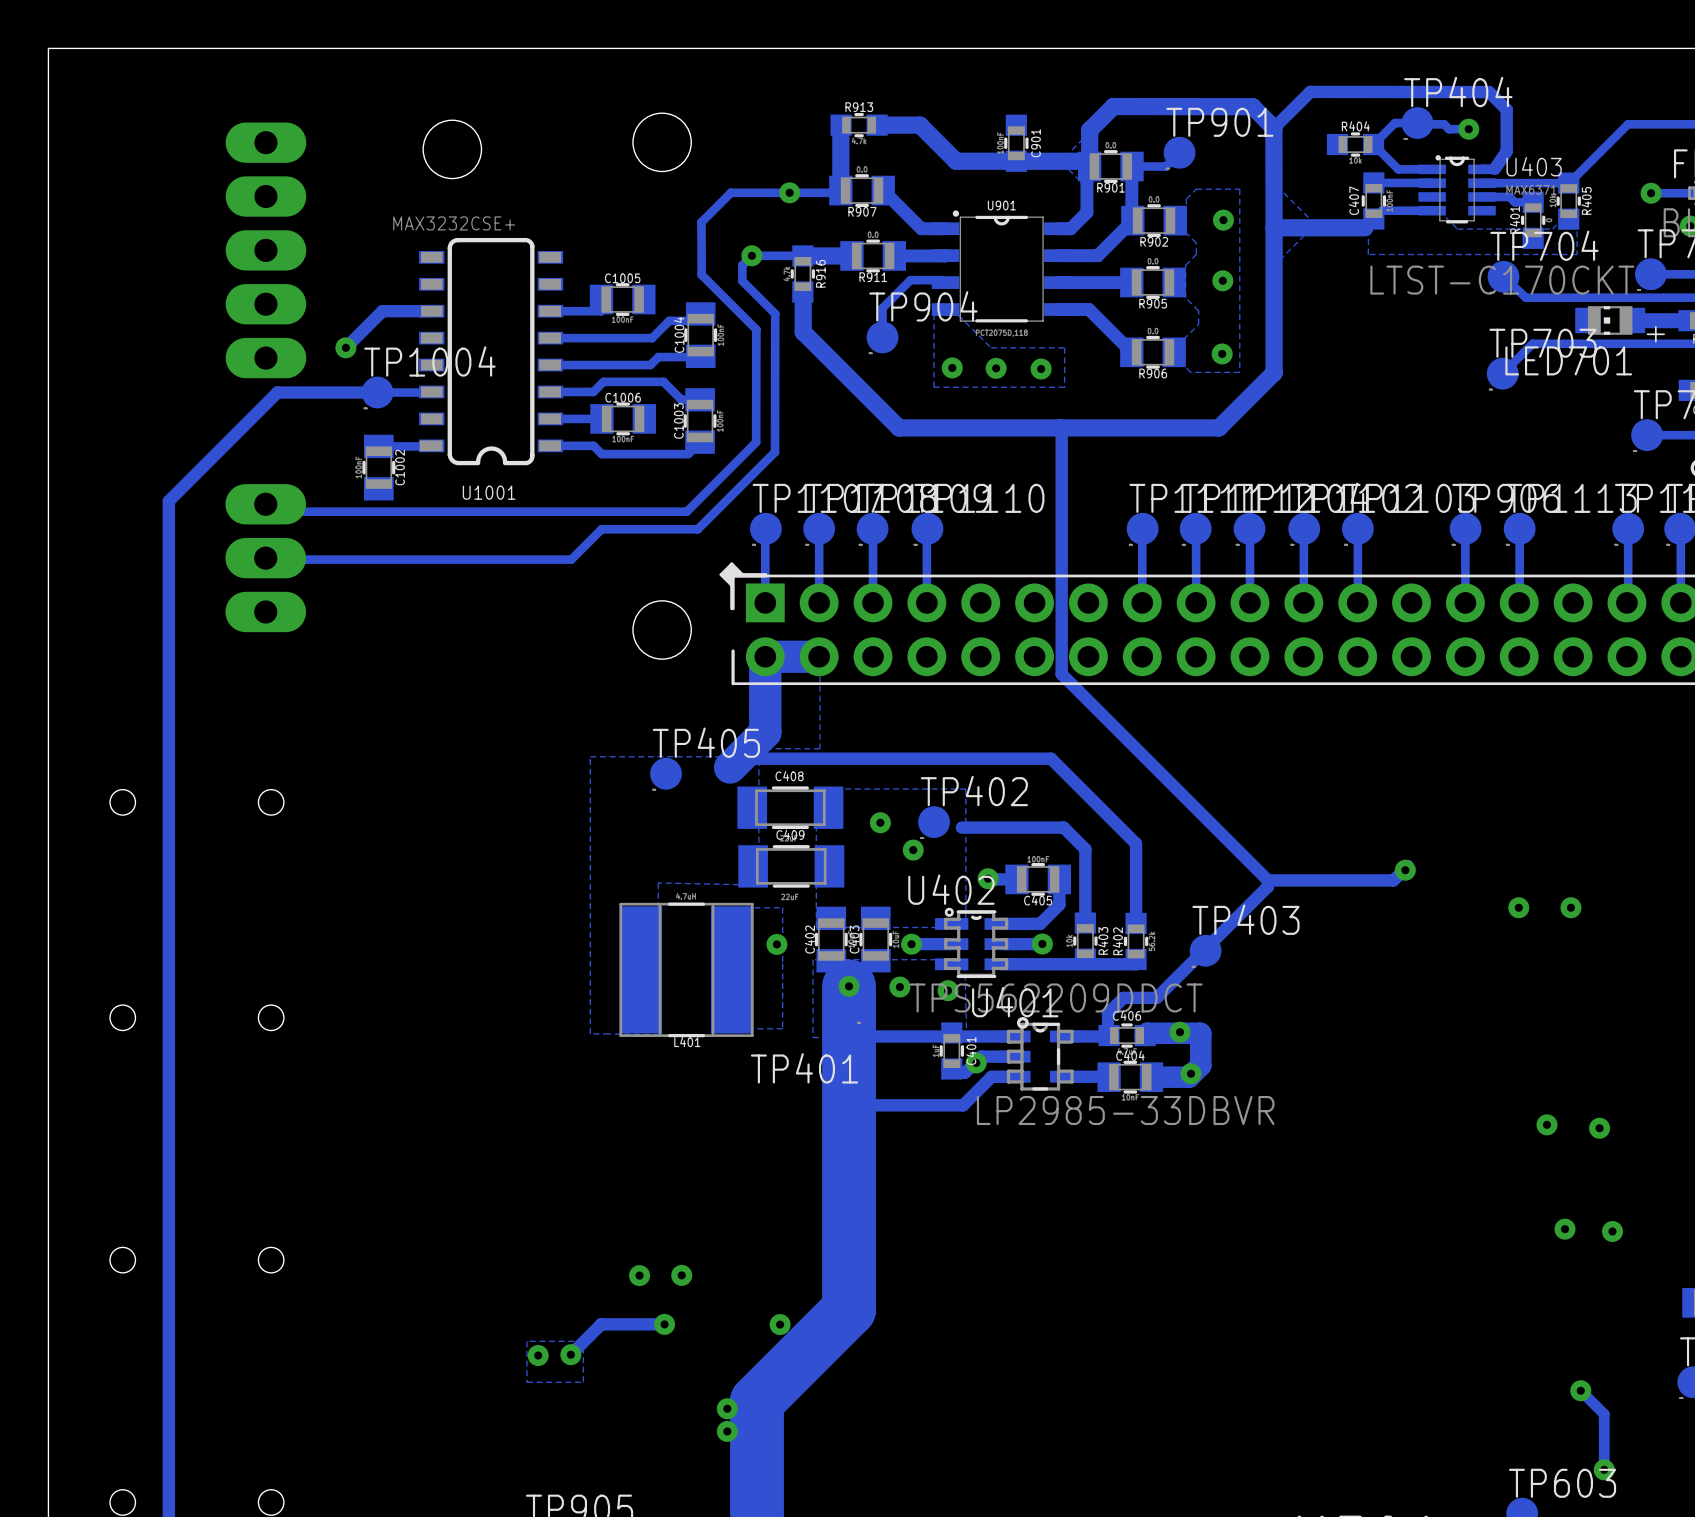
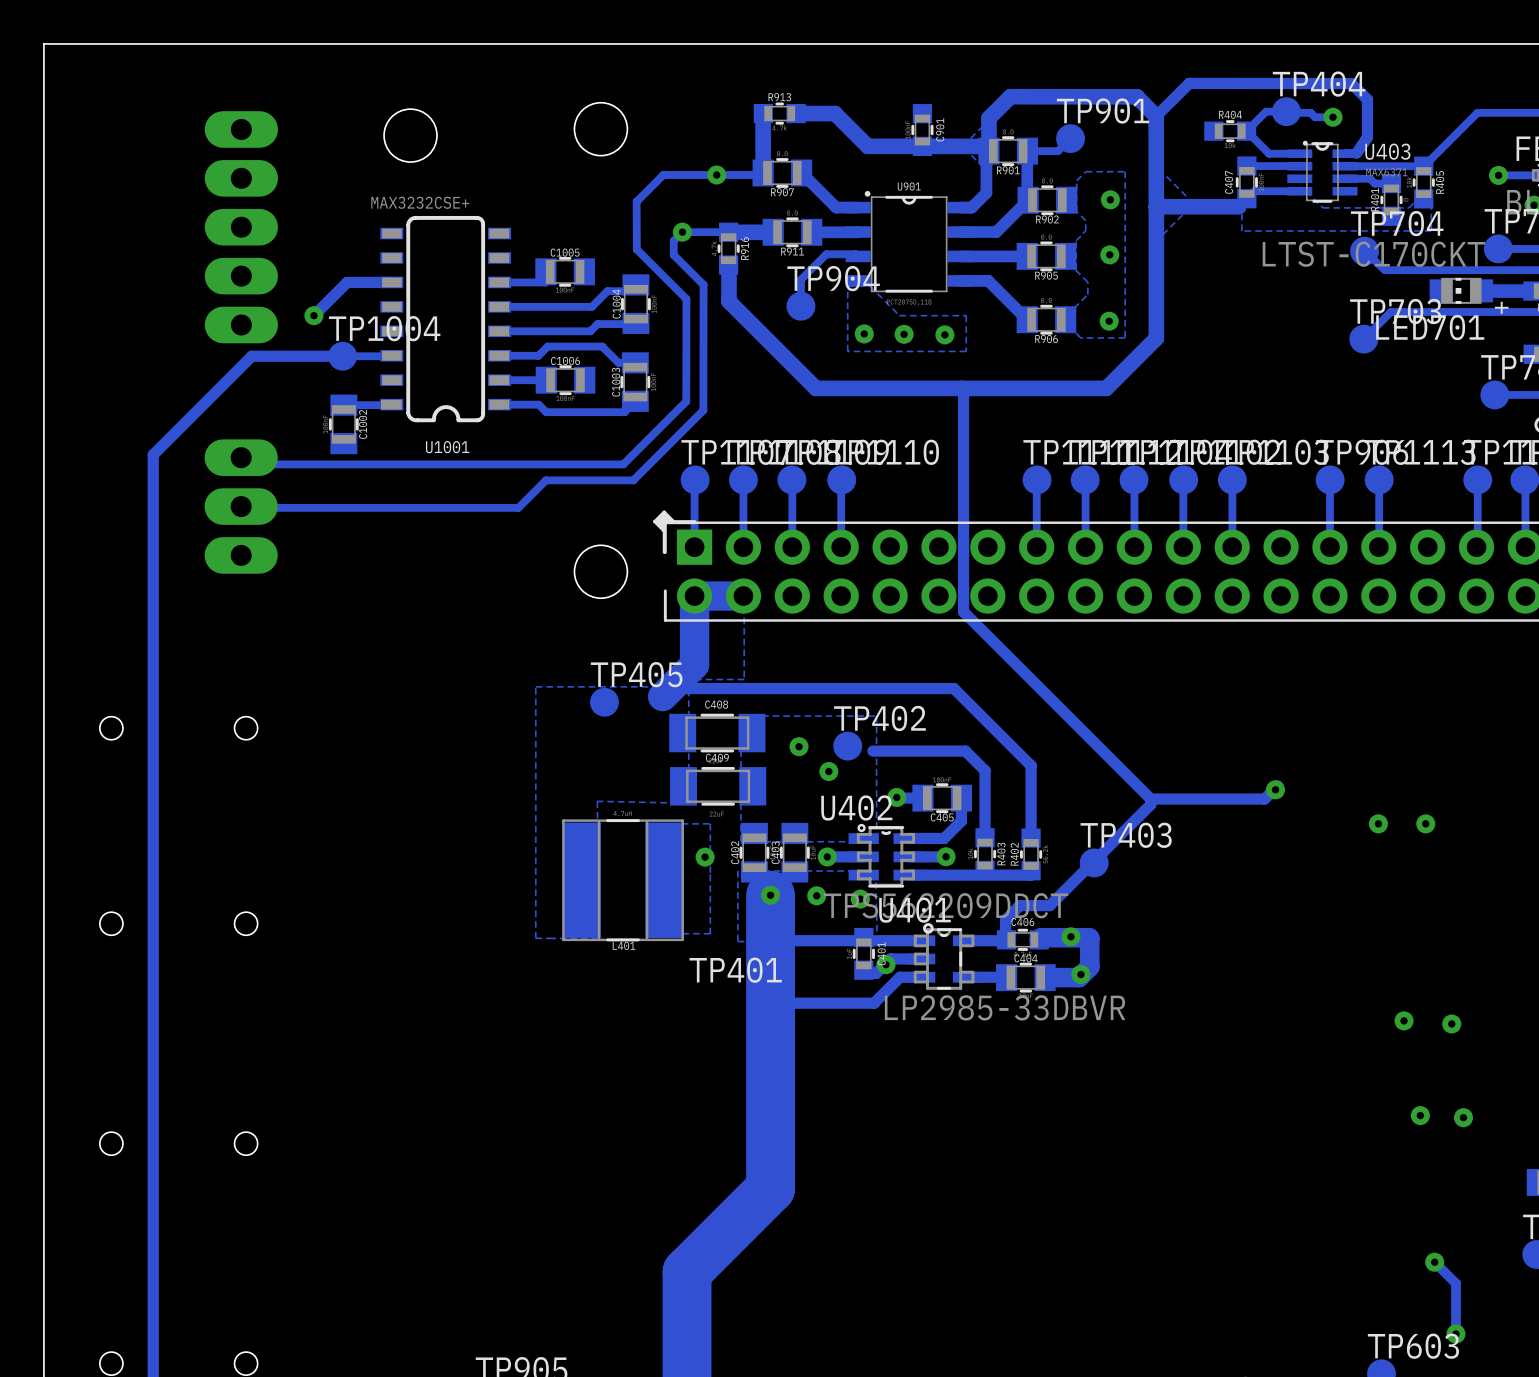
via: (639, 1275) -> none
via: (681, 1275) -> none
track: (664, 1324) (601, 1324) (570, 1354) -> none
via: (664, 1324) -> none
via: (780, 1324) -> none
zone outline: (583, 1341) (526, 1341) (526, 1382) (583, 1382) (583, 1341) -> none
via: (570, 1354) -> none
via: (538, 1355) -> none
via: (727, 1408) -> none
via: (727, 1431) -> none

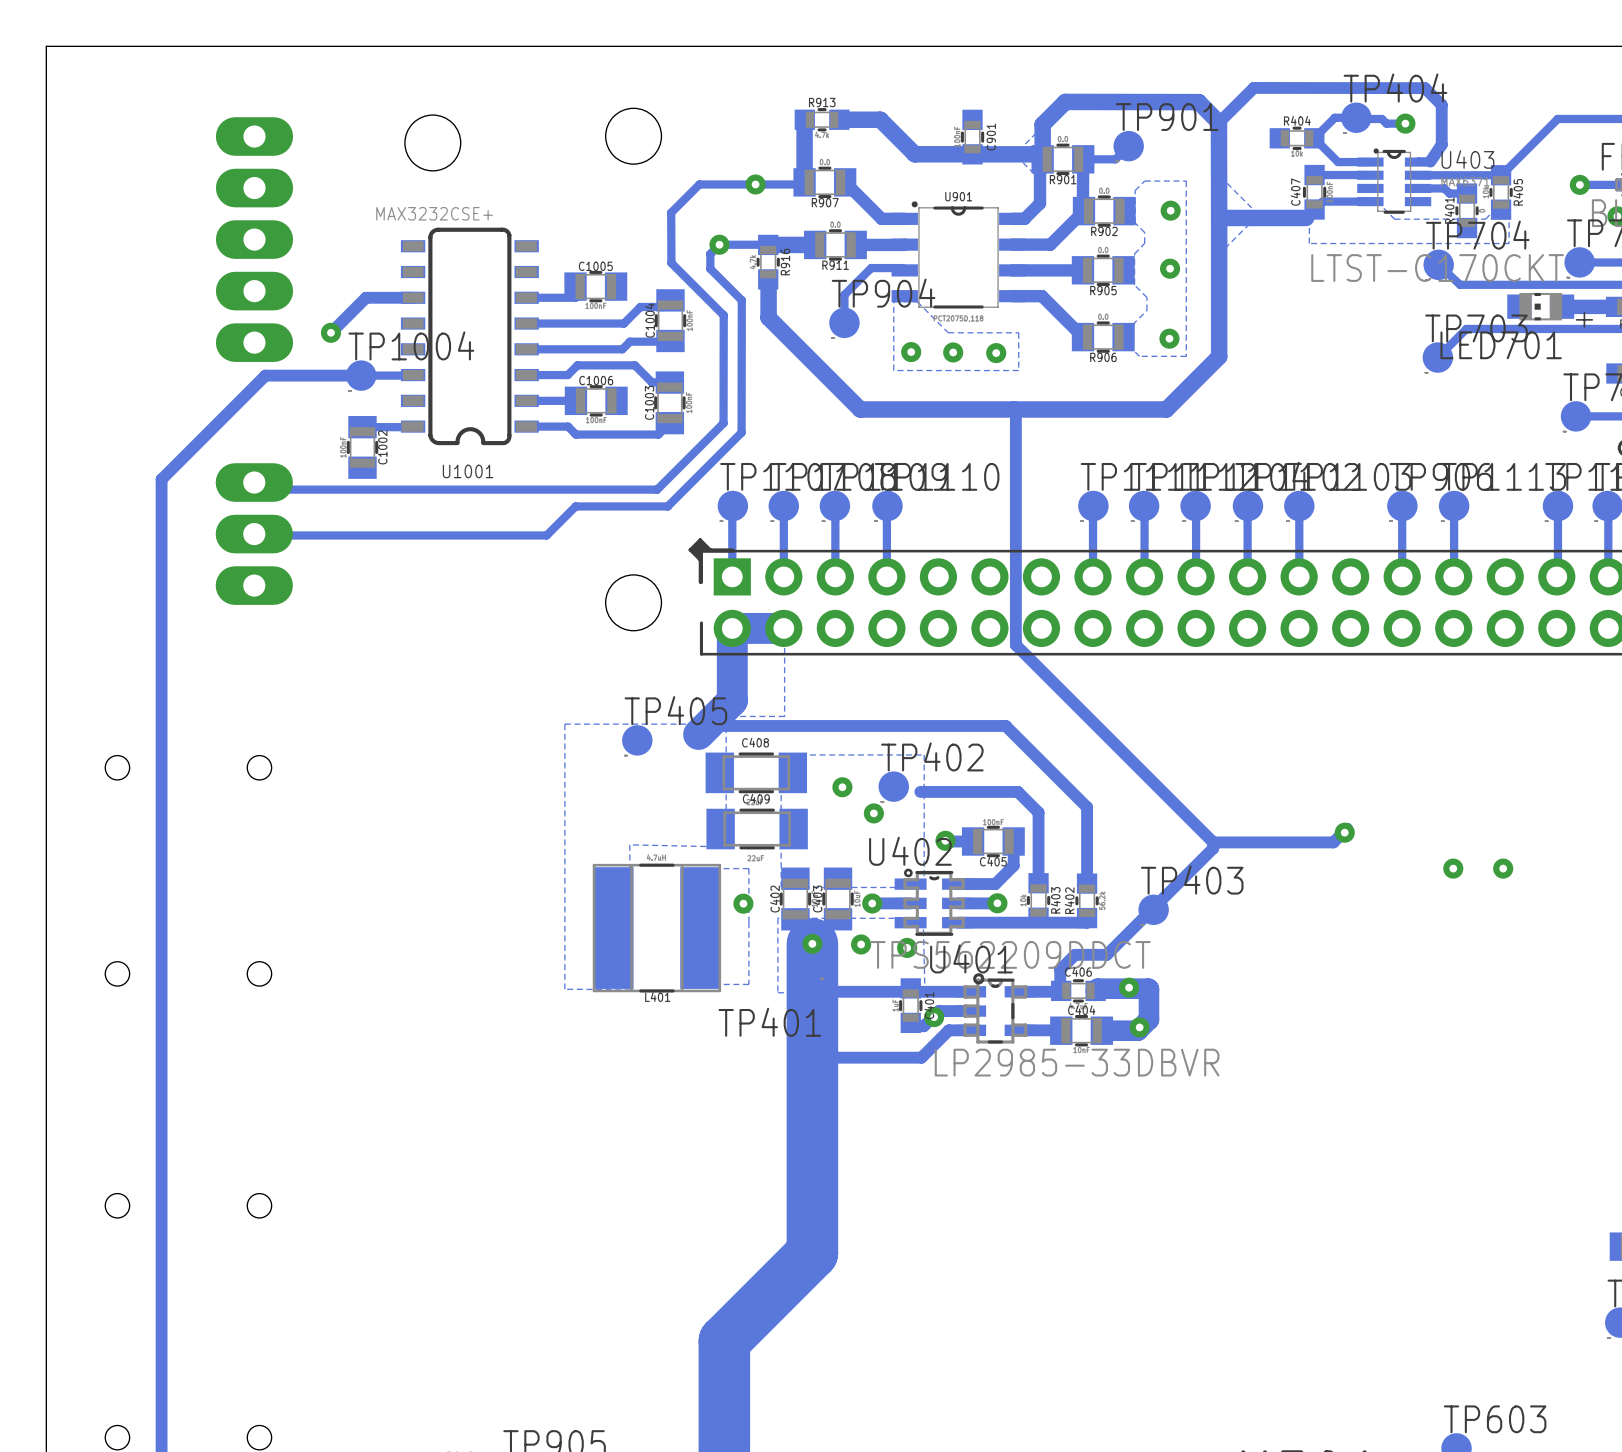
via: (1404, 1020) -> none
via: (1451, 1023) -> none
via: (1420, 1115) -> none
via: (1463, 1117) -> none
track: (1434, 1262) (1455, 1283) (1455, 1333) -> none
via: (1434, 1262) -> none
via: (1455, 1333) -> none

